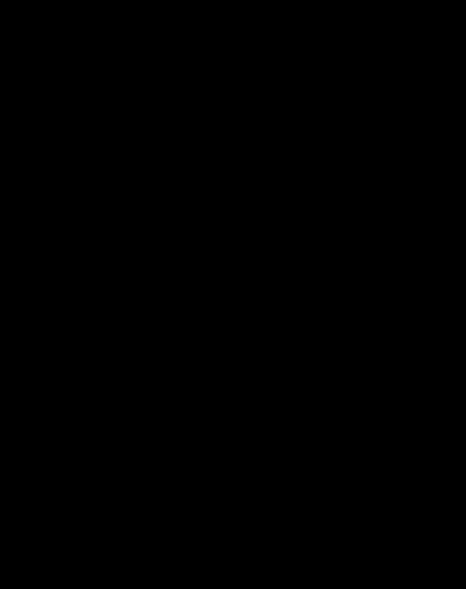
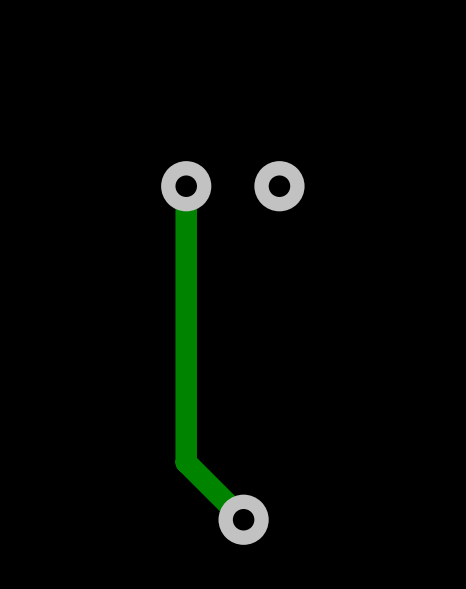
track: none -> (186, 186) (186, 462) (243, 519)
via: none -> (186, 186)
via: none -> (279, 186)
via: none -> (243, 519)

